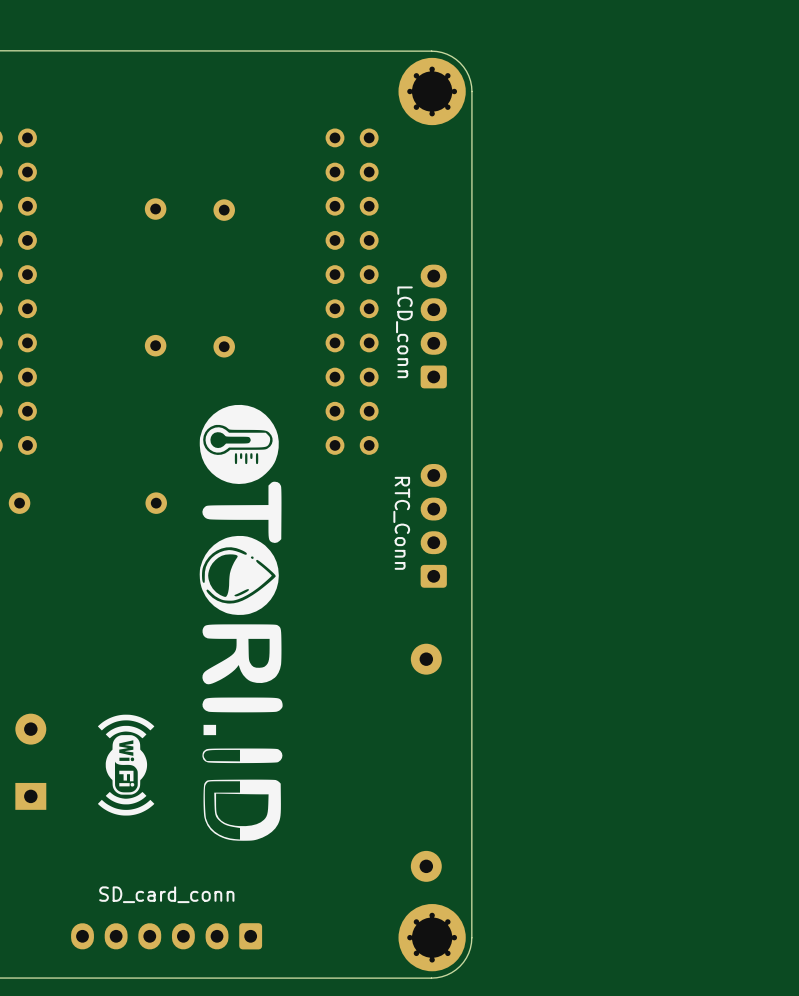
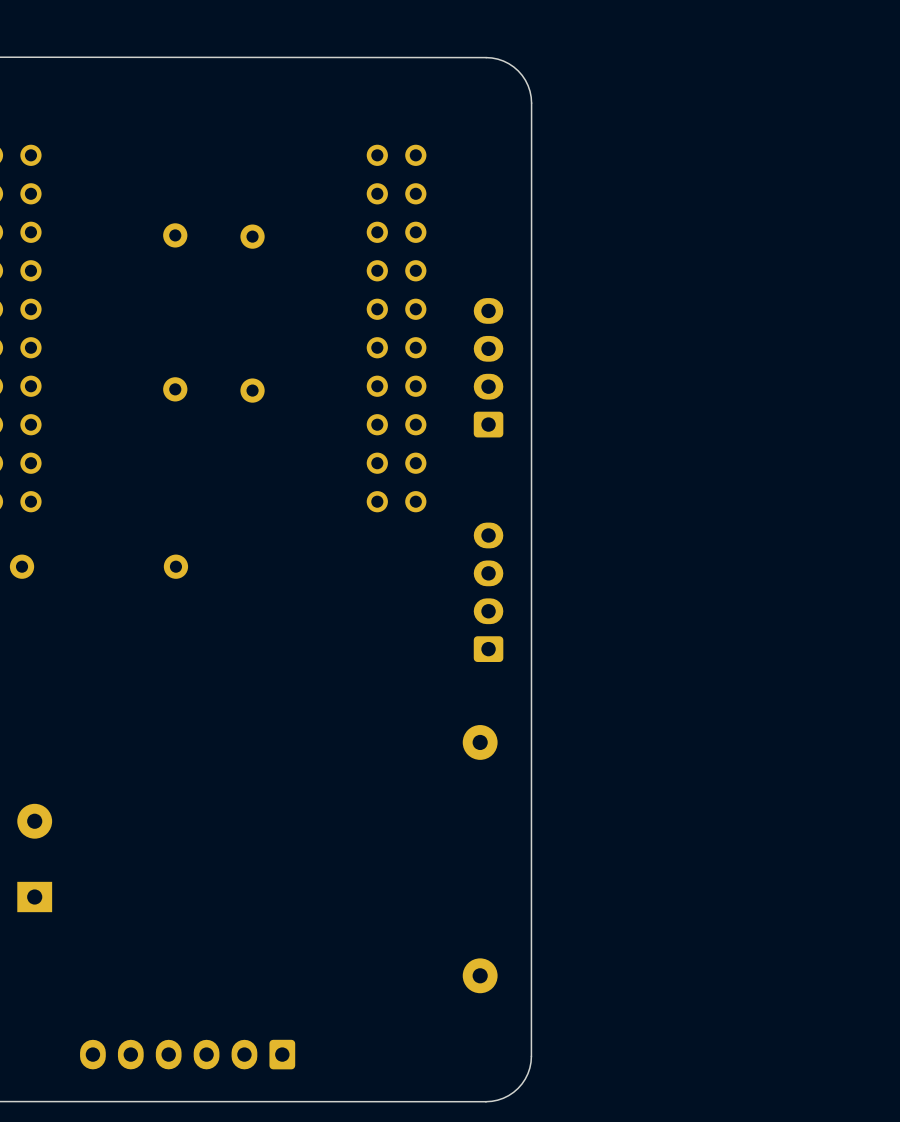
part: (432, 91) -> none
part value: LCD_conn (404, 332) -> none
drawing: [199, 404, 283, 841] -> none
part value: RTC_Conn (401, 523) -> none
drawing: [97, 714, 155, 816] -> none
part value: SD_card_conn (166, 894) -> none
part: (432, 937) -> none

